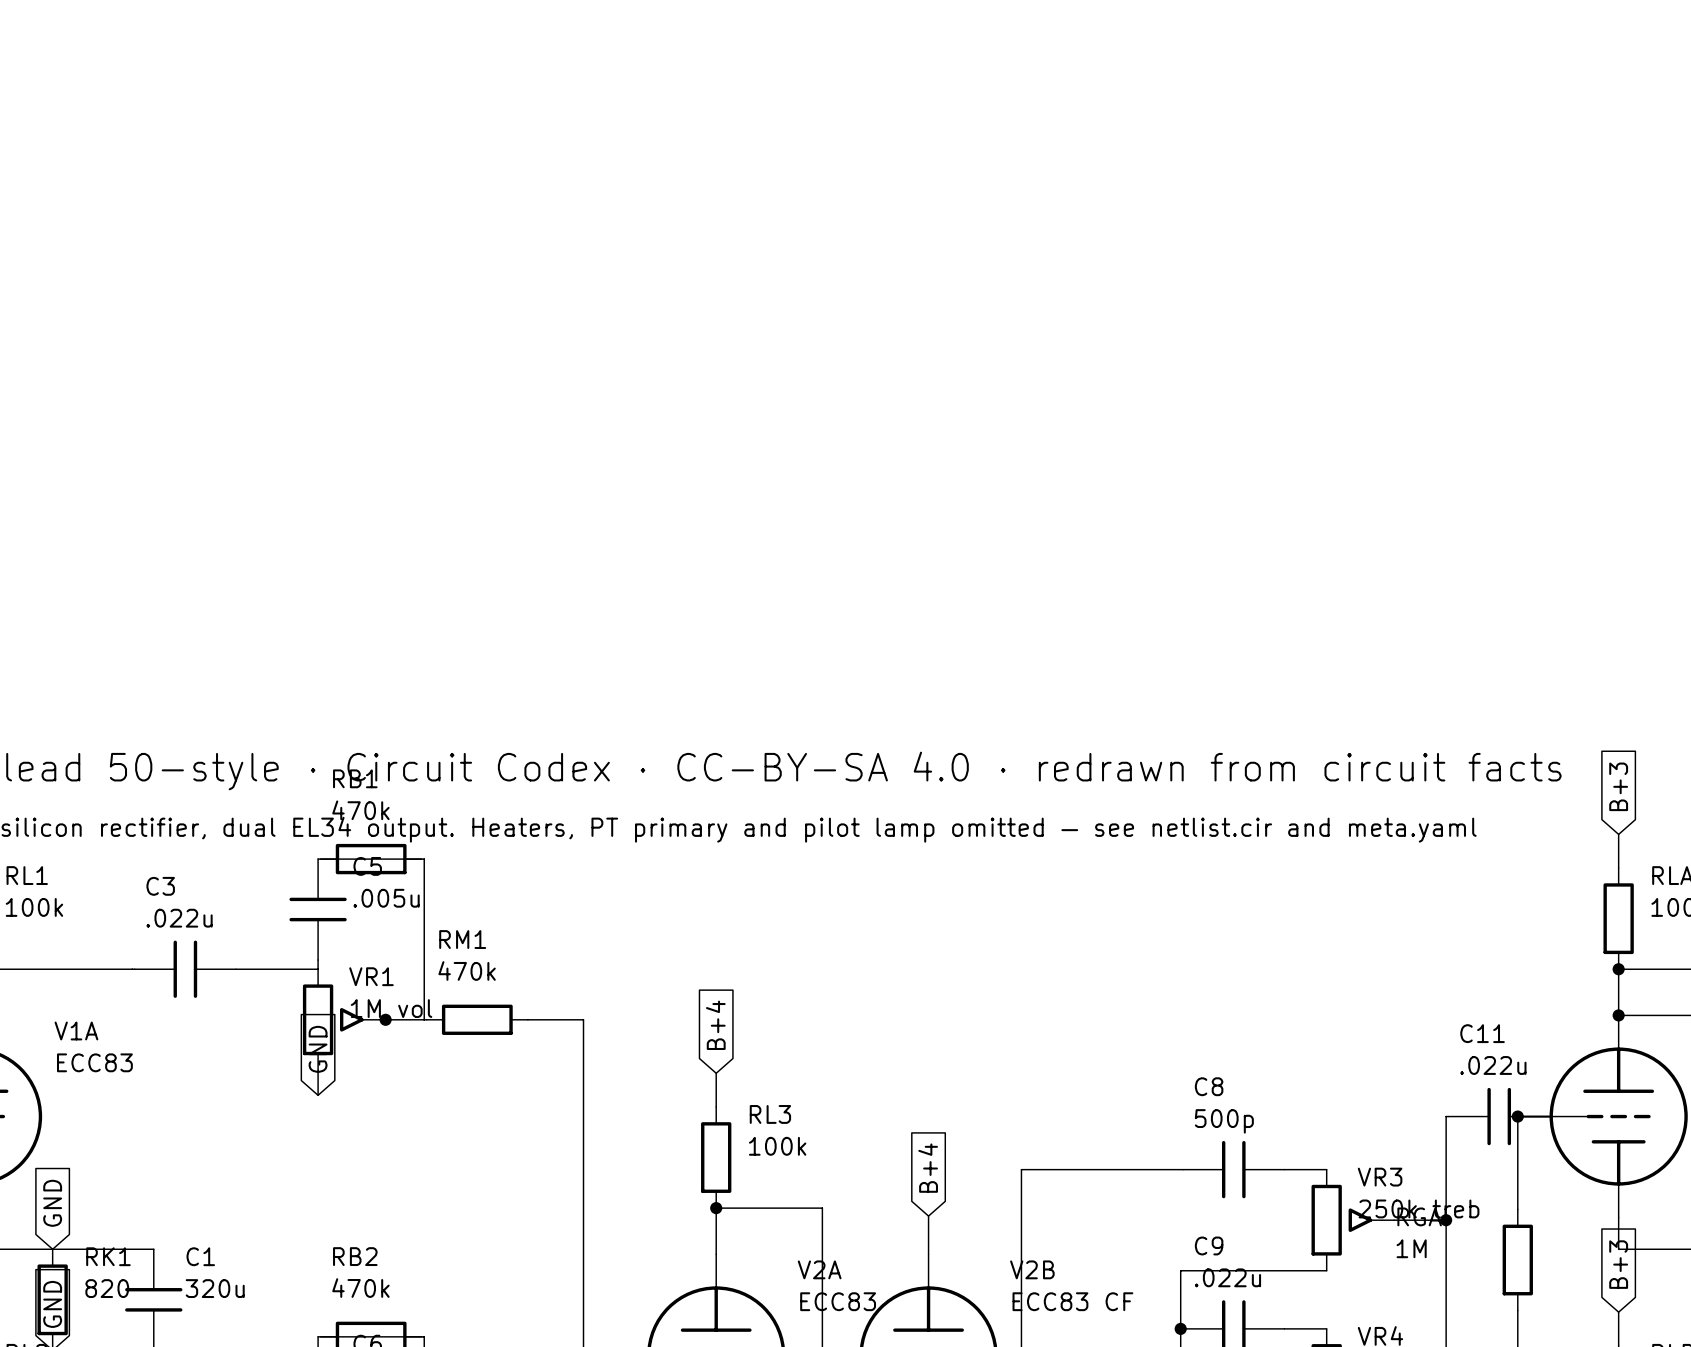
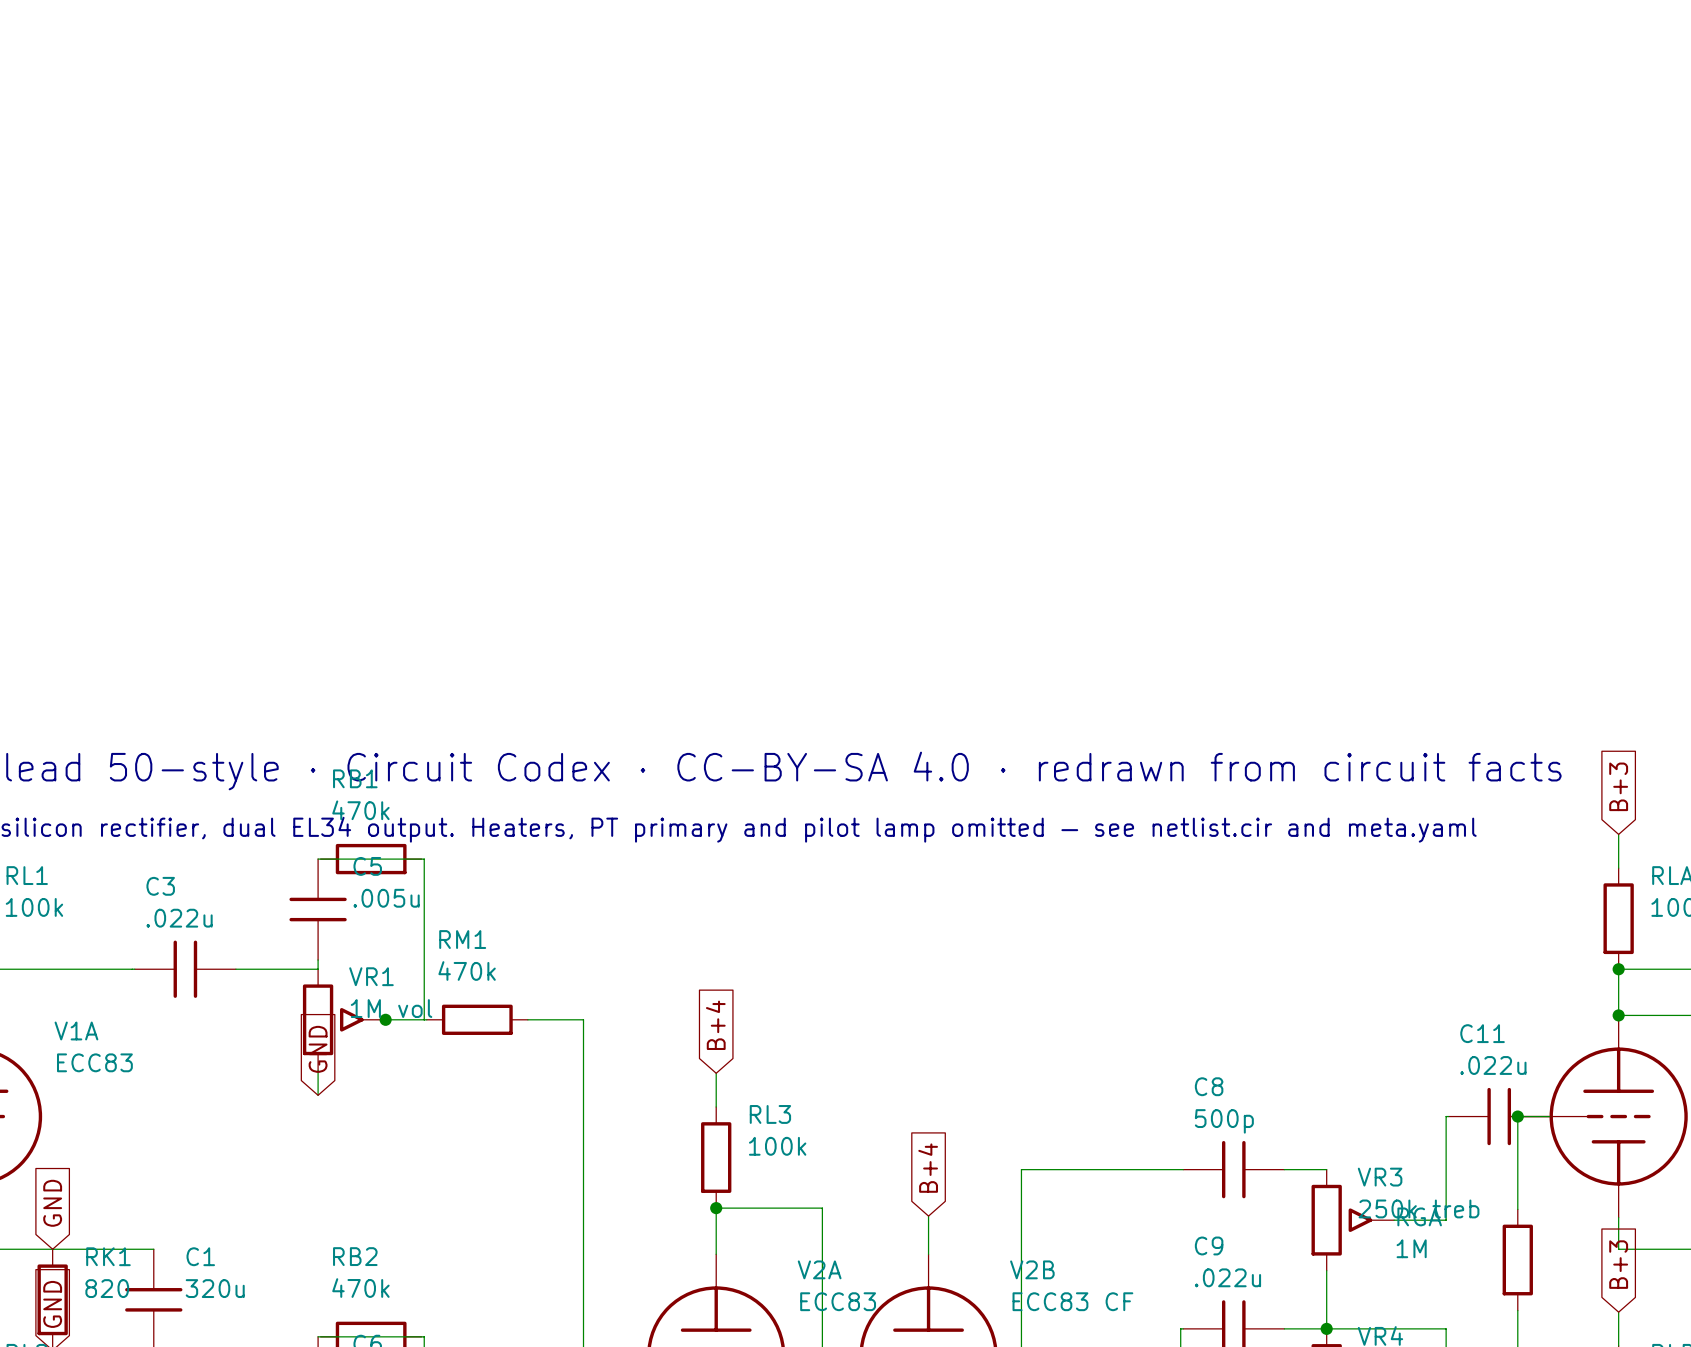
wire: (1446, 1220) (1446, 1328) -> (1326, 1270) (1326, 1328) (1446, 1328)
junction: (1446, 1220) -> none
wire: (1326, 1270) (1180, 1270) (1180, 1328) -> none
junction: (1180, 1328) -> none
junction: none -> (1326, 1328)

